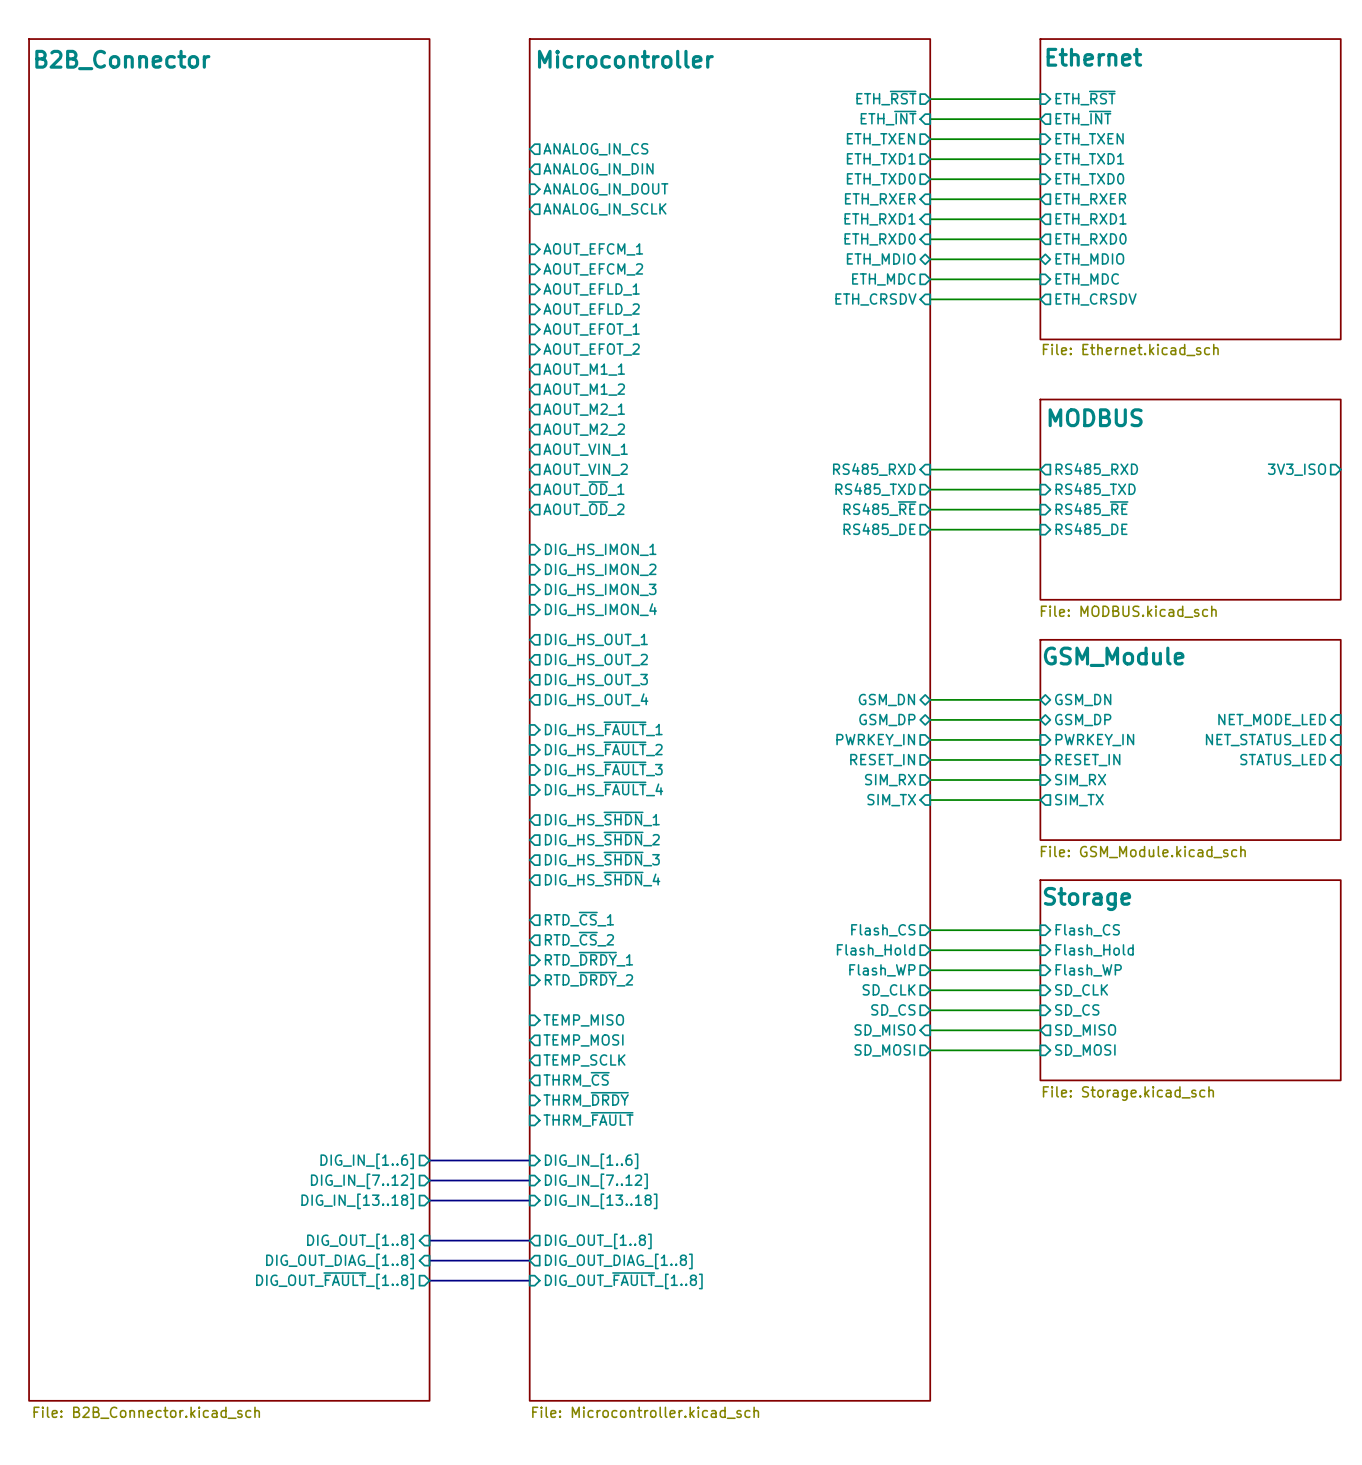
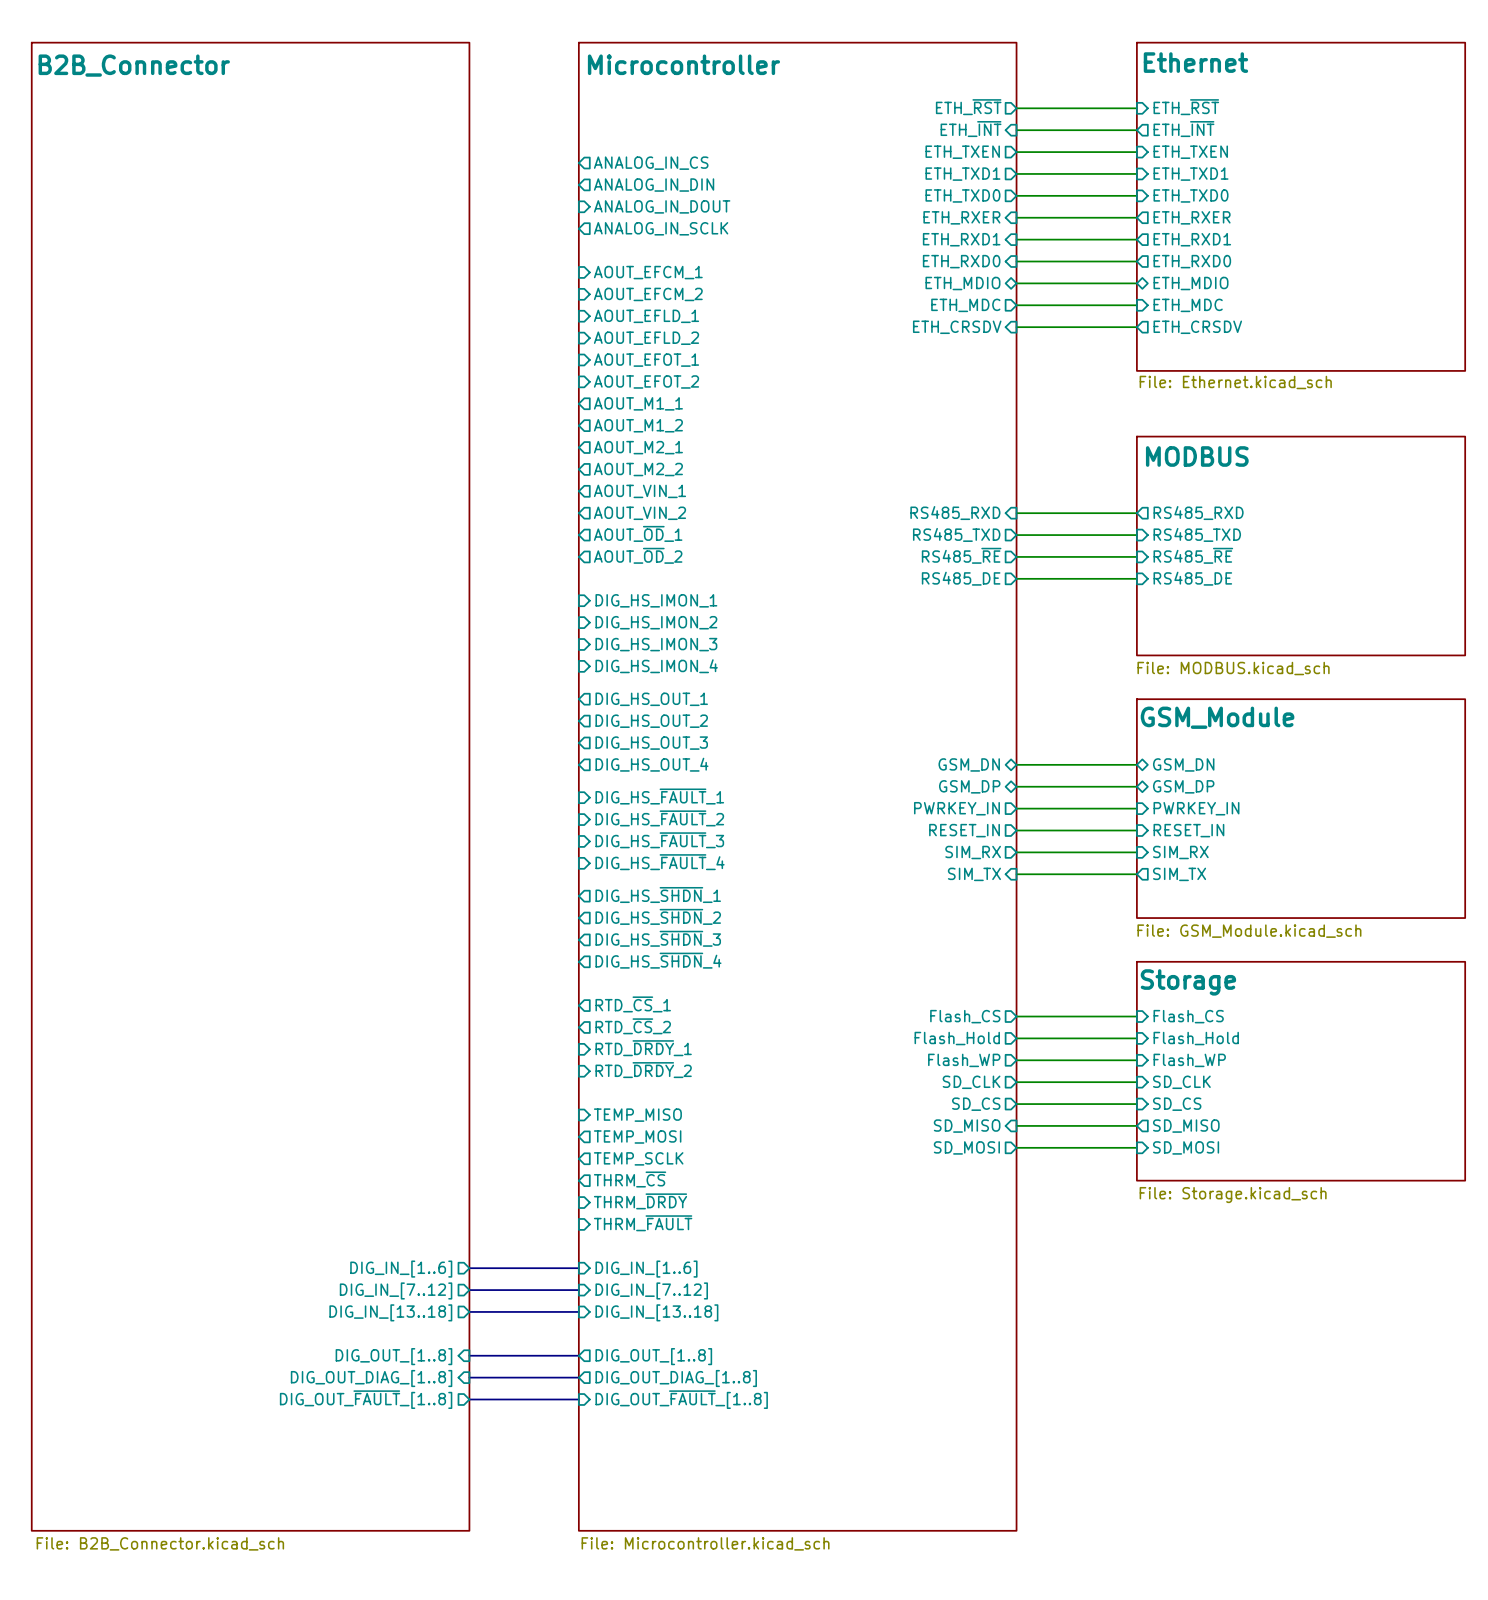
sheet pin: 3V3_ISO (1296, 469) -> none
sheet pin: NET_MODE_LED (1272, 720) -> none
sheet pin: NET_STATUS_LED (1265, 740) -> none
sheet pin: STATUS_LED (1283, 760) -> none

